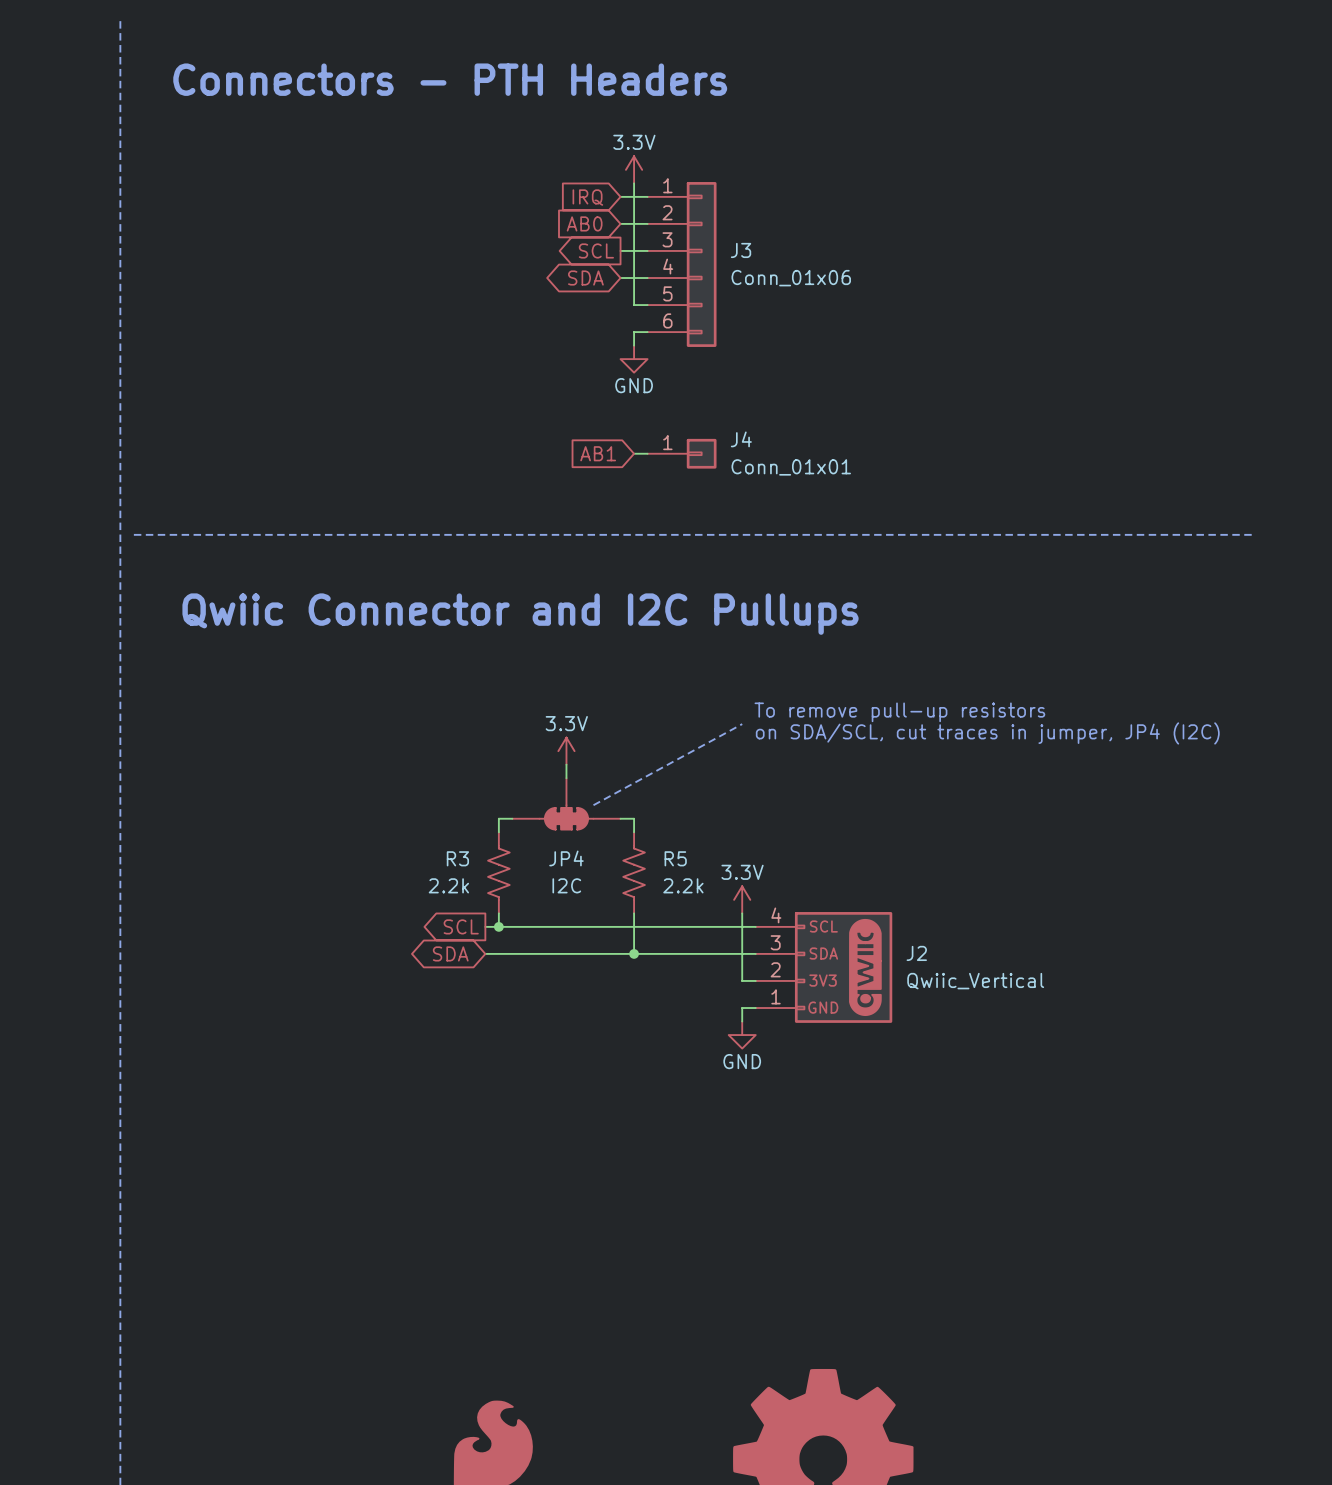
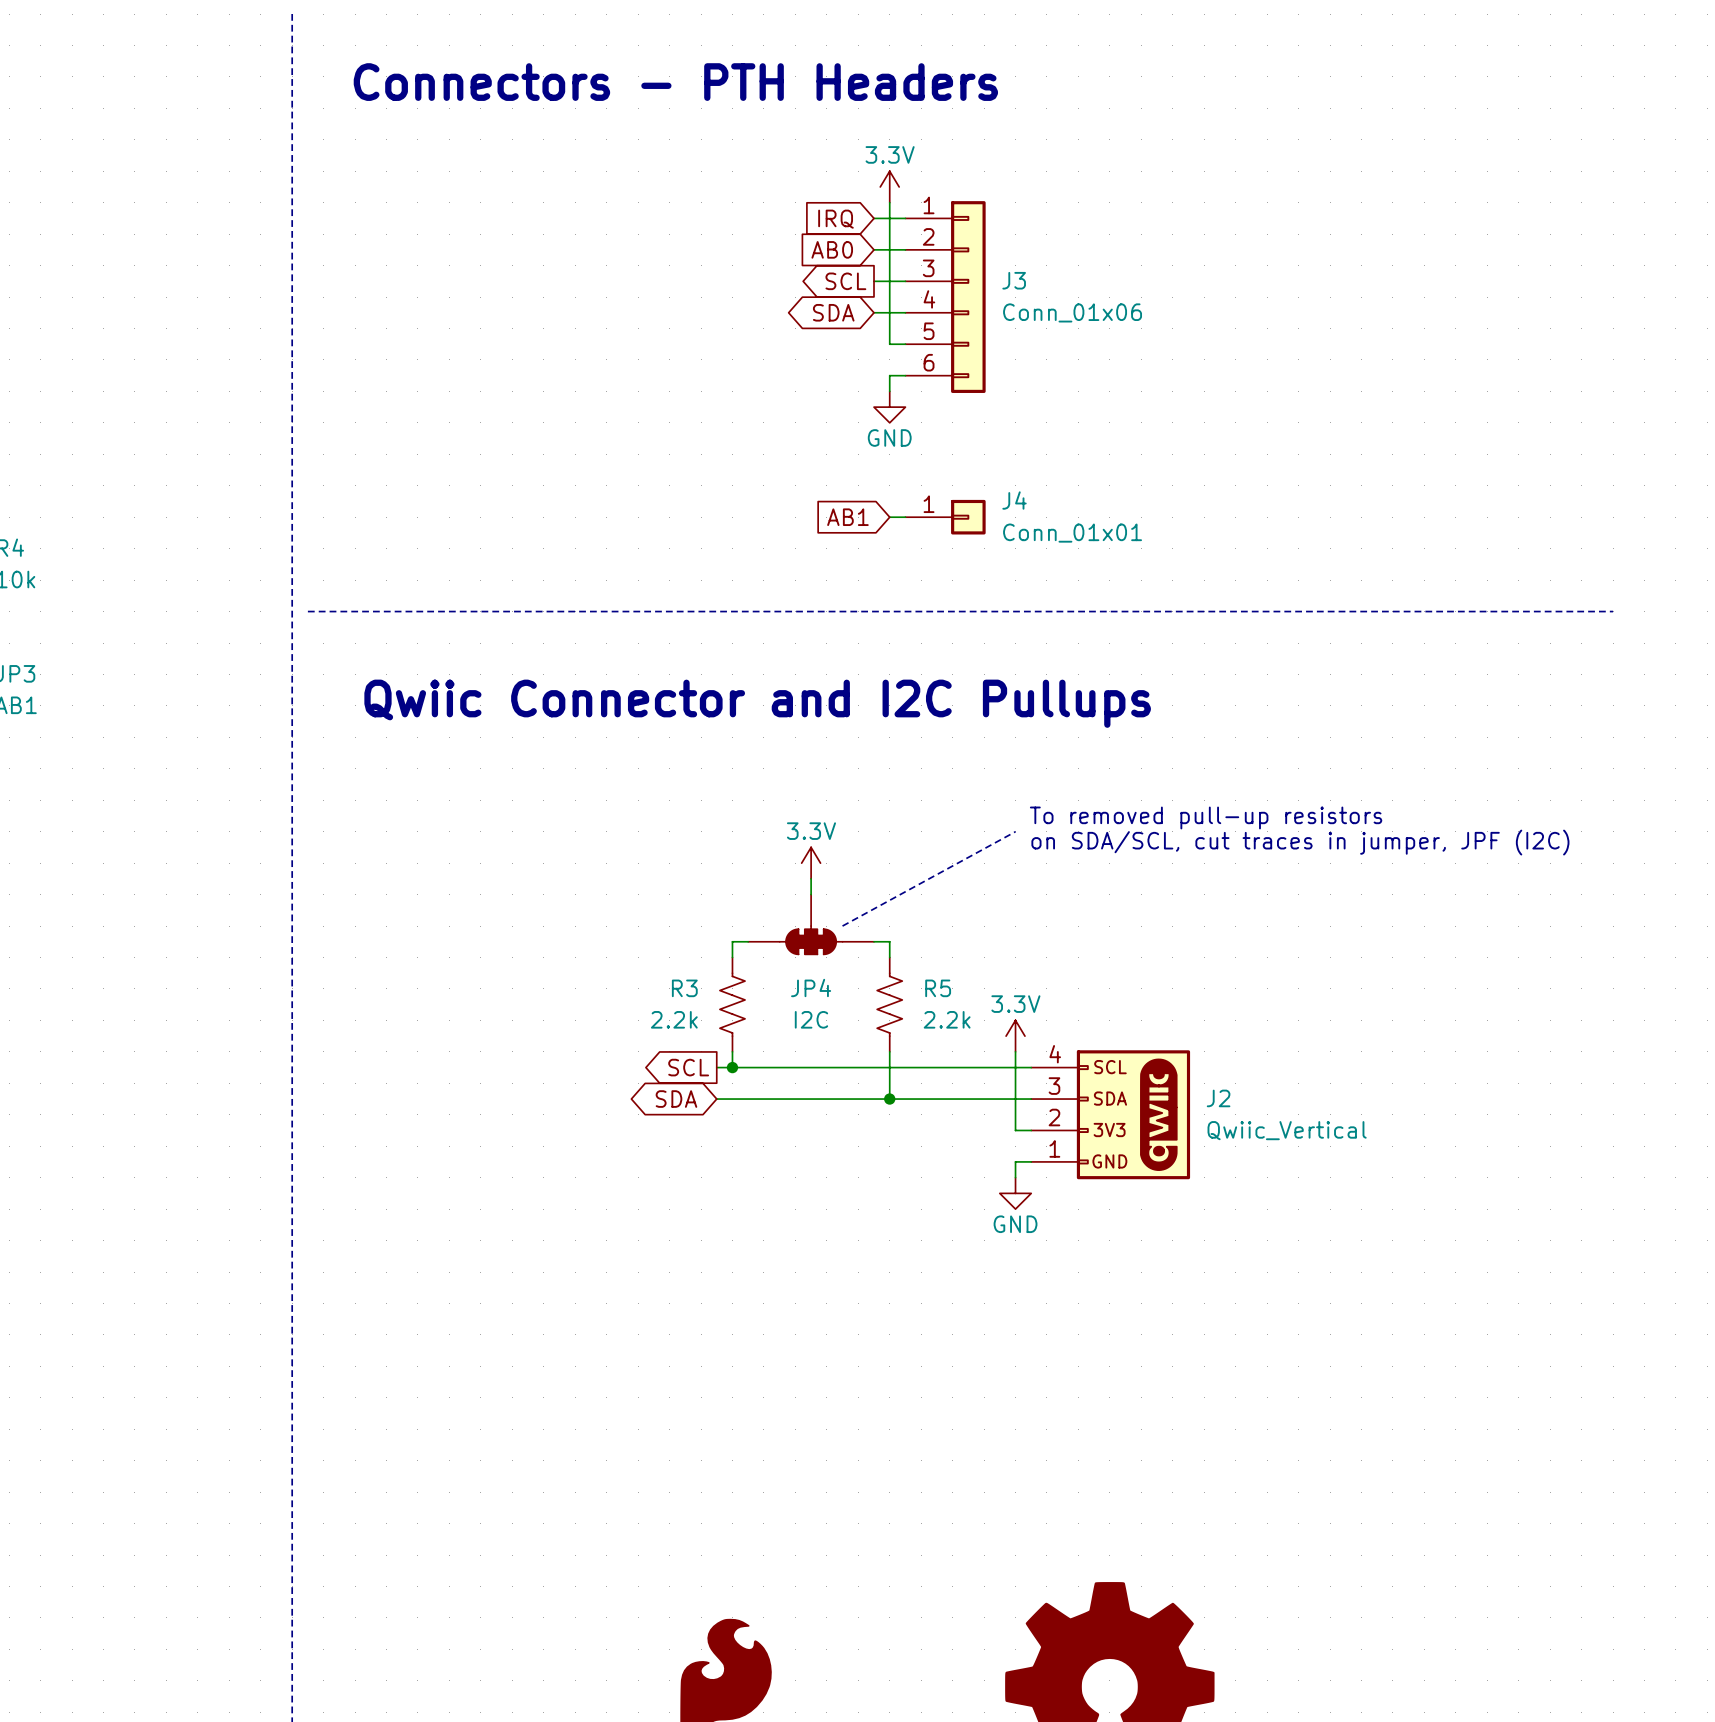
text: To remove pull-up resistors (899, 712) -> To removed pull-up resistors (1206, 817)
text: on SDA/SCL, cut traces in jumper, JP4 (I2C) (987, 733) -> on SDA/SCL, cut traces in jumper, JPF (I2C) (1300, 842)

